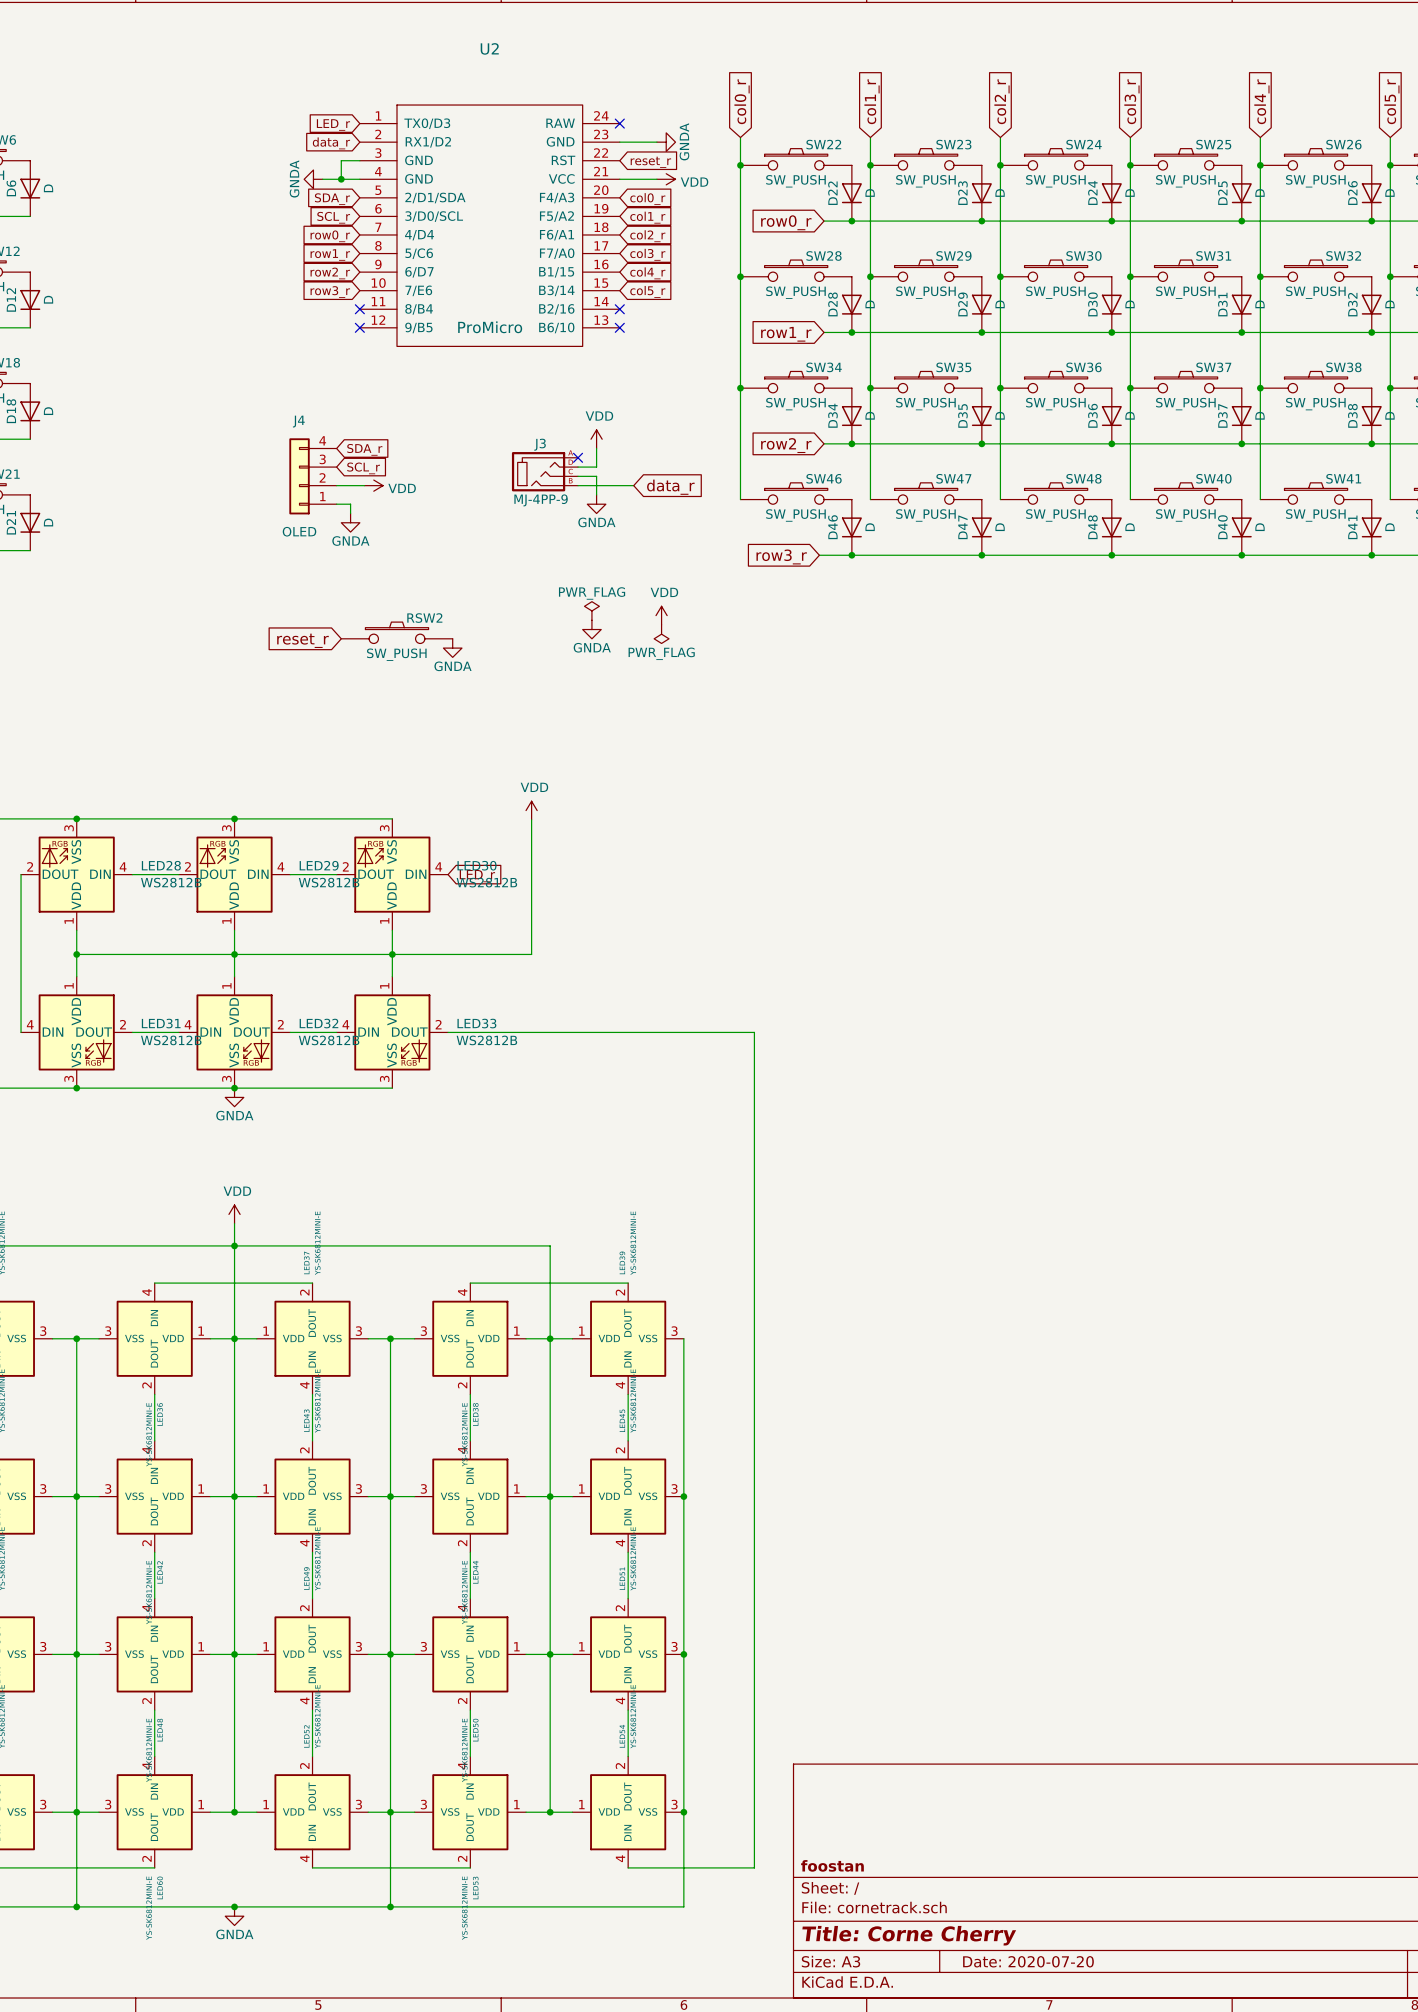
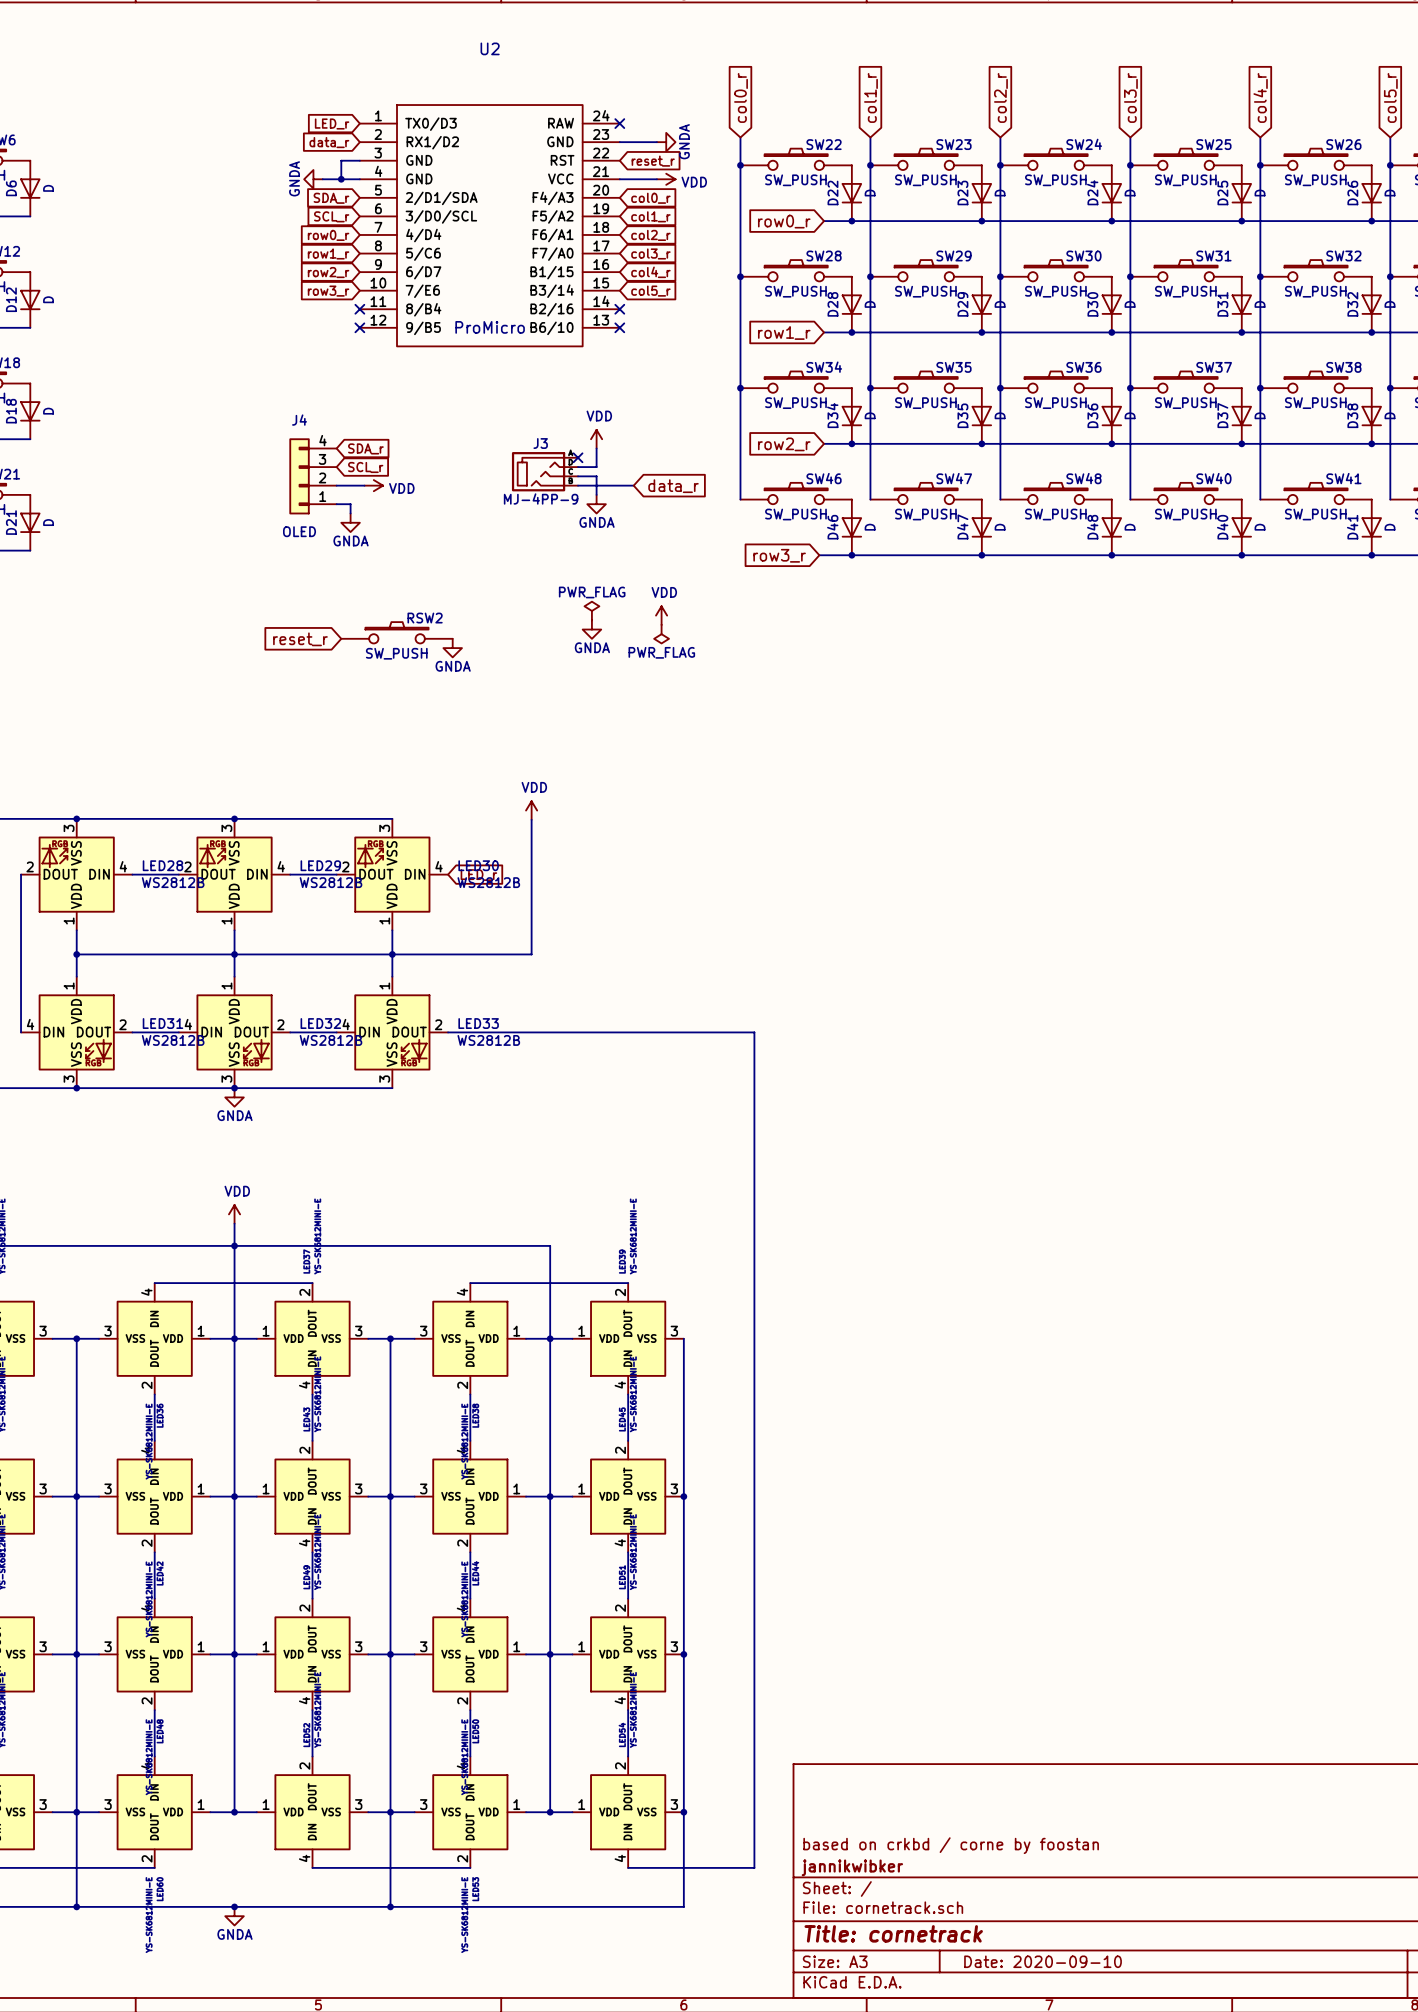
title block: none -> based on crkbd / corne by foostan (951, 1845)
title block: foostan (832, 1865) -> jannikwibker (852, 1867)
title block: Title: Corne Cherry (909, 1935) -> Title: cornetrack (893, 1933)
title block: Date: 2020-07-20 (1028, 1961) -> Date: 2020-09-10 (1043, 1961)

